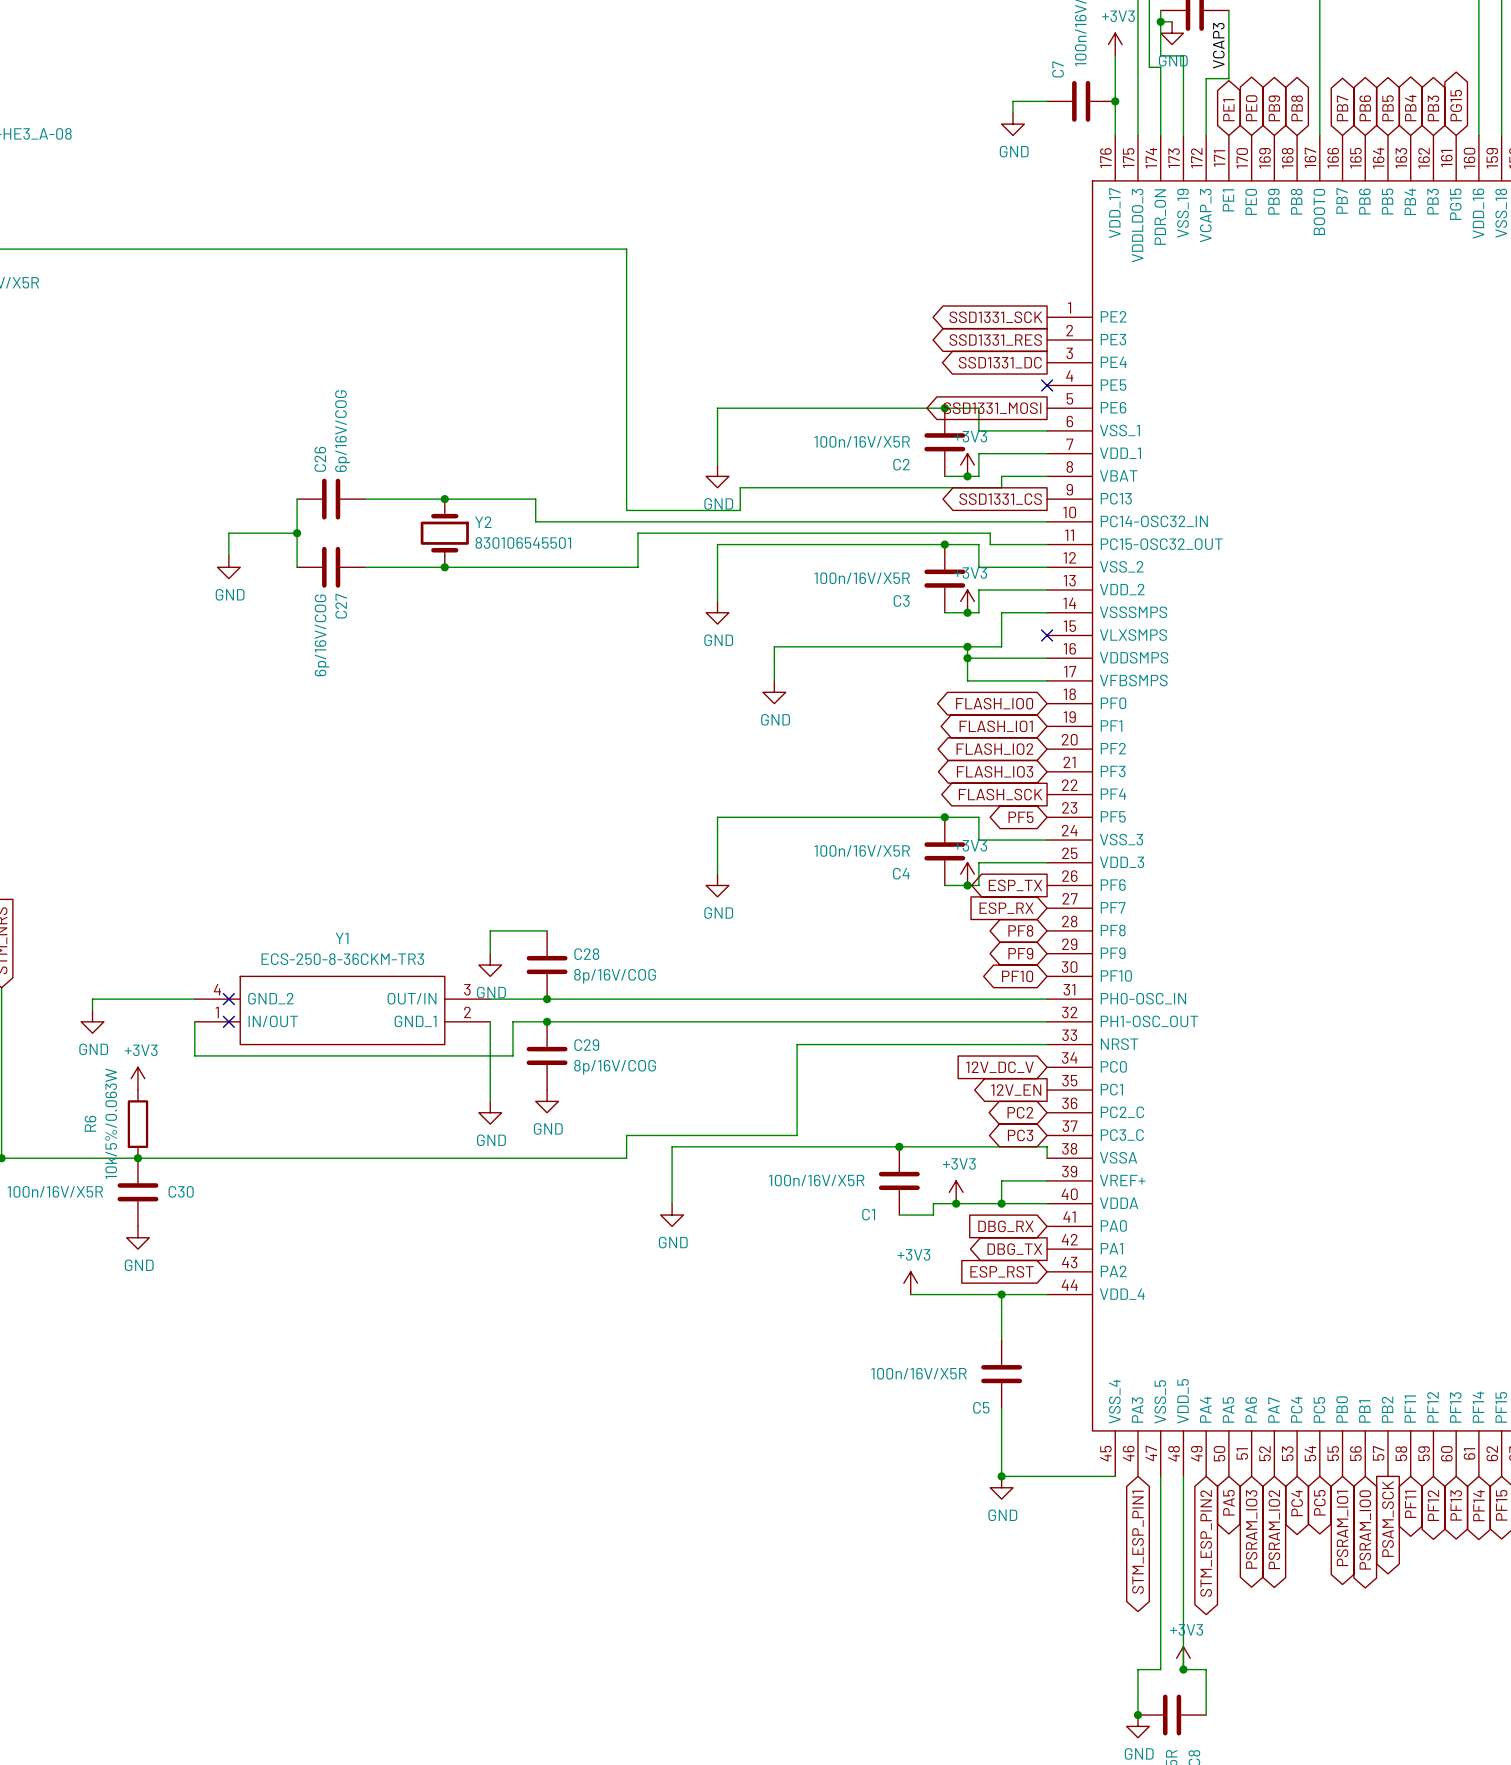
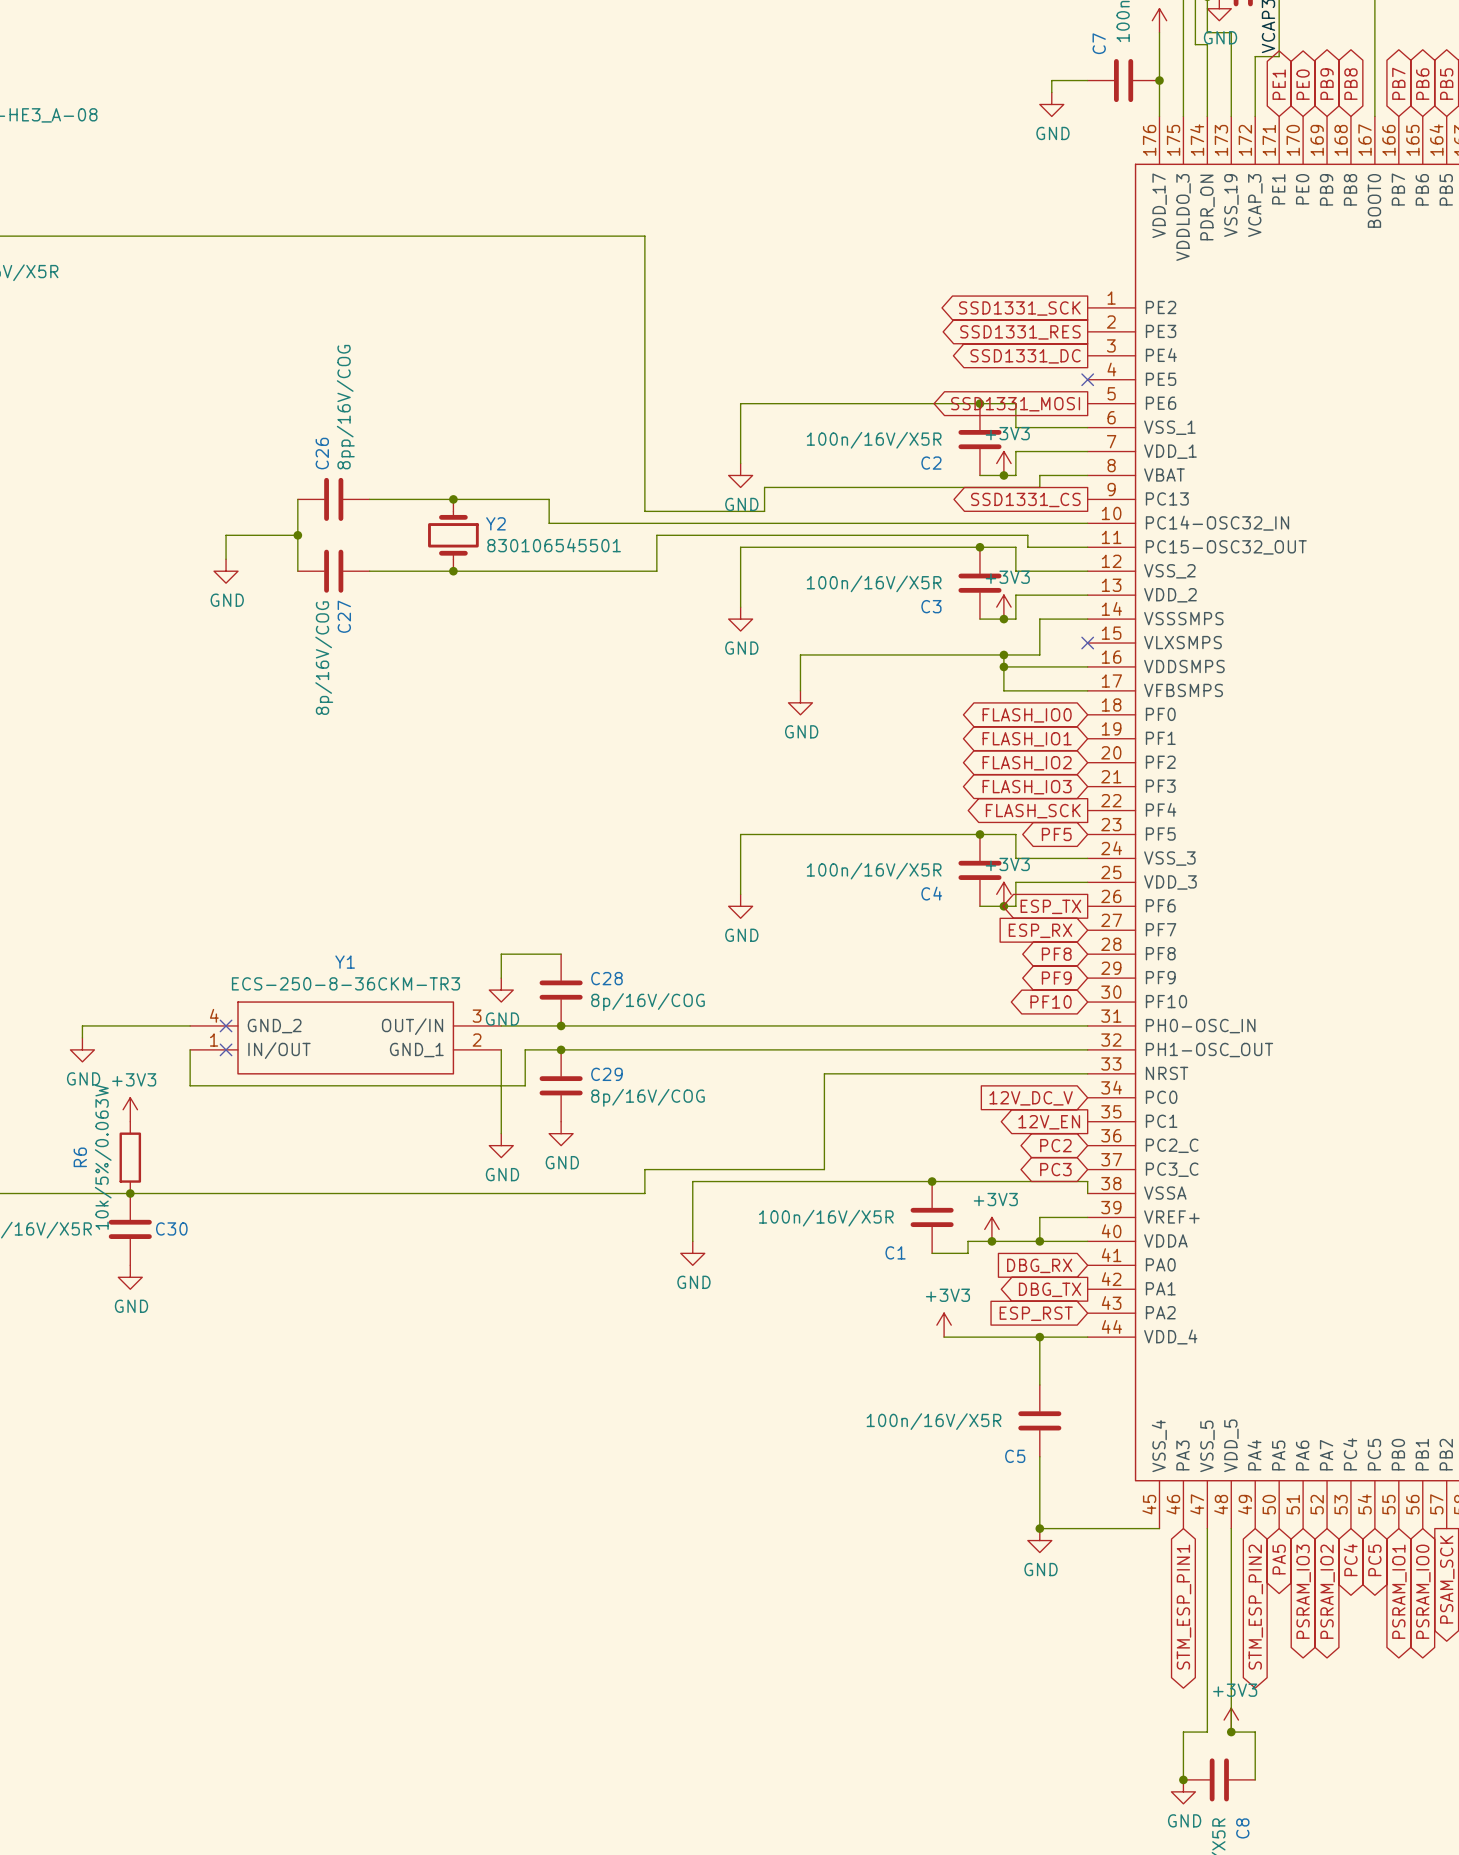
C26 value: 6p/16V/COG (342, 431) -> 8pp/16V/COG (345, 407)
C27 value: 6p/16V/COG (322, 635) -> 8p/16V/COG (324, 658)

